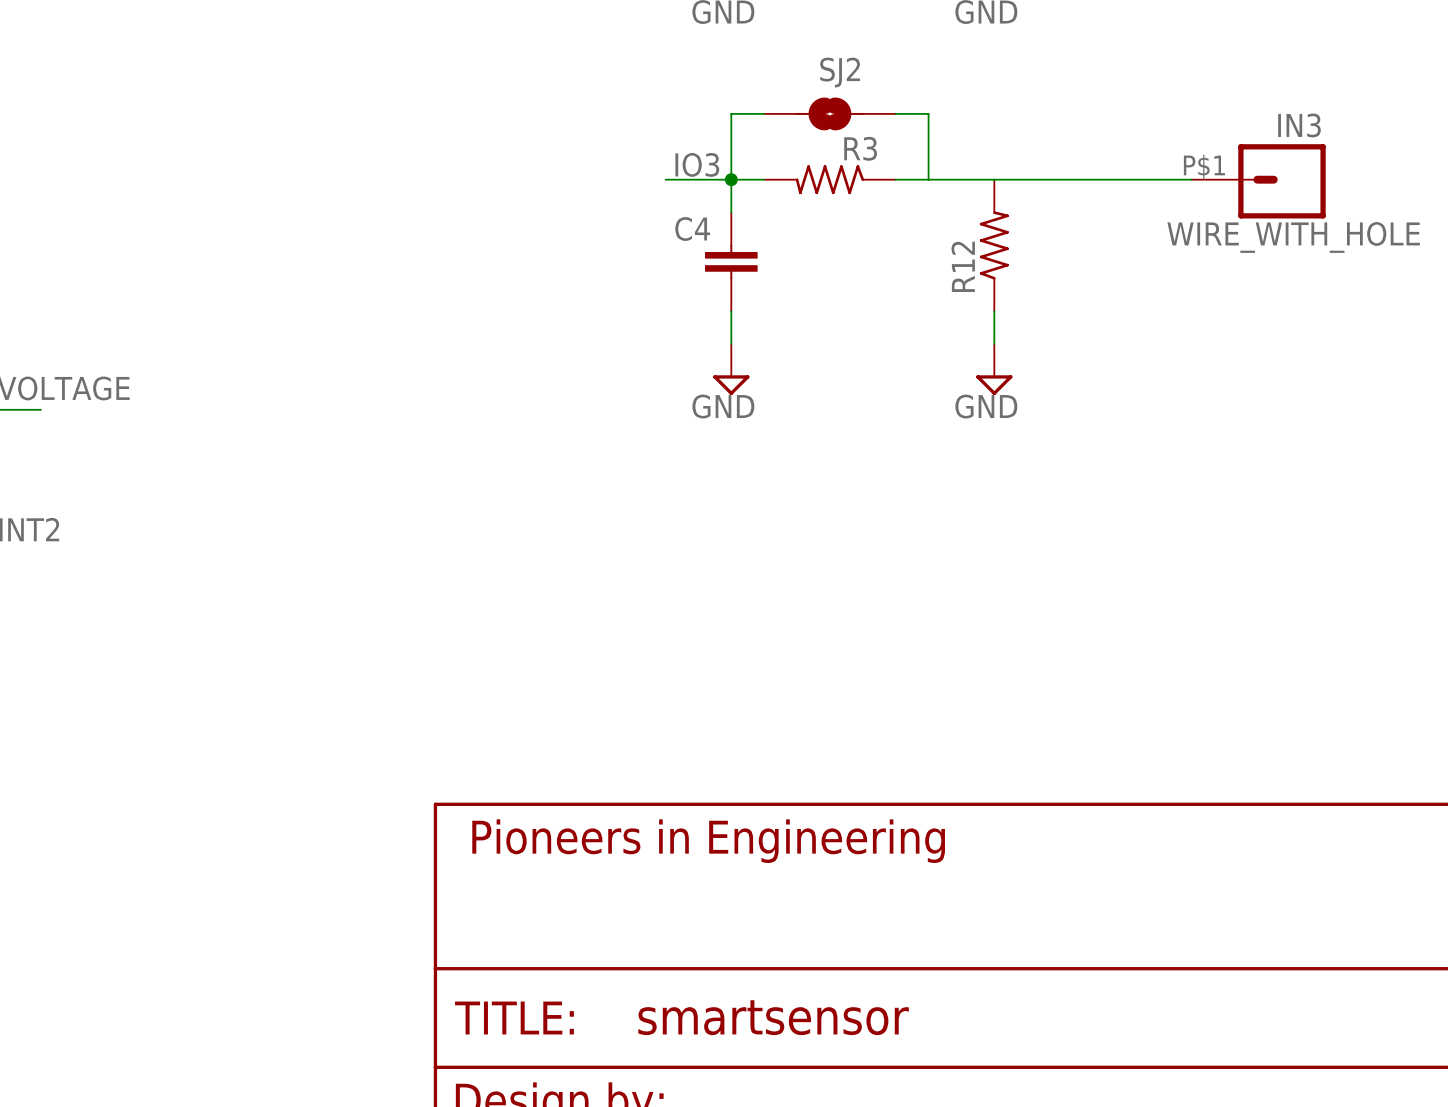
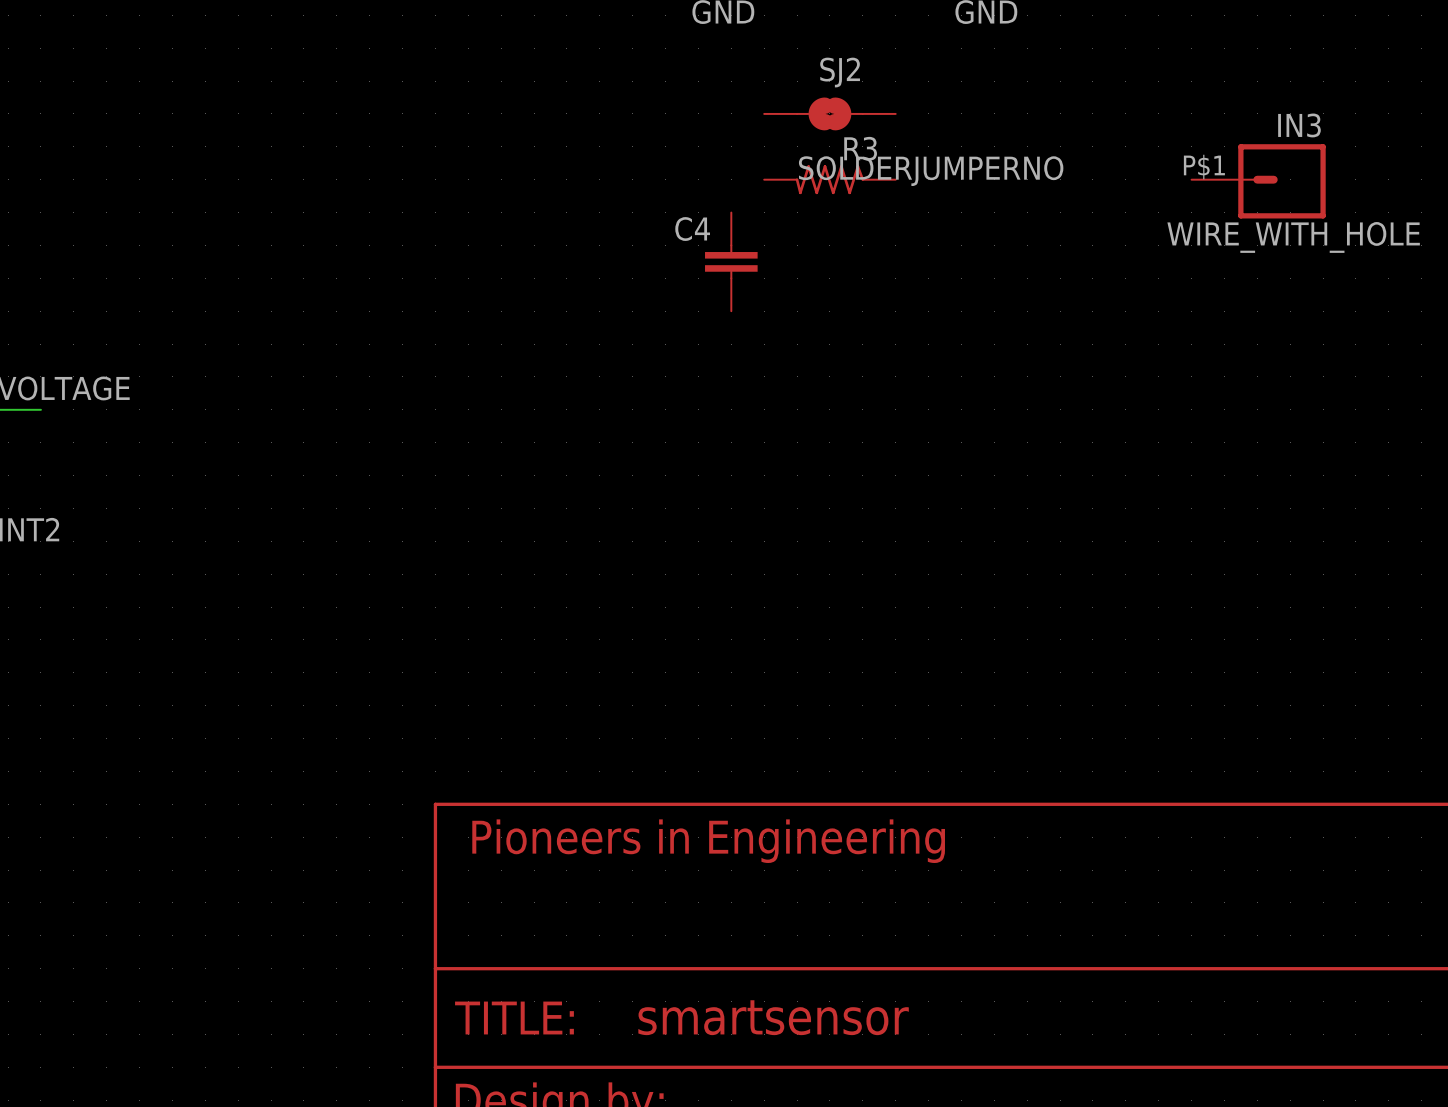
wire: (764, 113) (731, 113) (731, 212) -> none
wire: (895, 113) (928, 113) (928, 179) -> none
label: IO3 (697, 164) -> none
SJ2 value: none -> SOLDERJUMPERNO (931, 171)
wire: (665, 179) (764, 179) -> none
junction: (731, 179) -> none
wire: (895, 179) (1191, 179) -> none
R12: (994, 245) -> none
wire: (731, 311) (731, 344) -> none
wire: (994, 311) (994, 344) -> none
power symbol: GND (731, 369) -> none
power symbol: GND (994, 369) -> none

